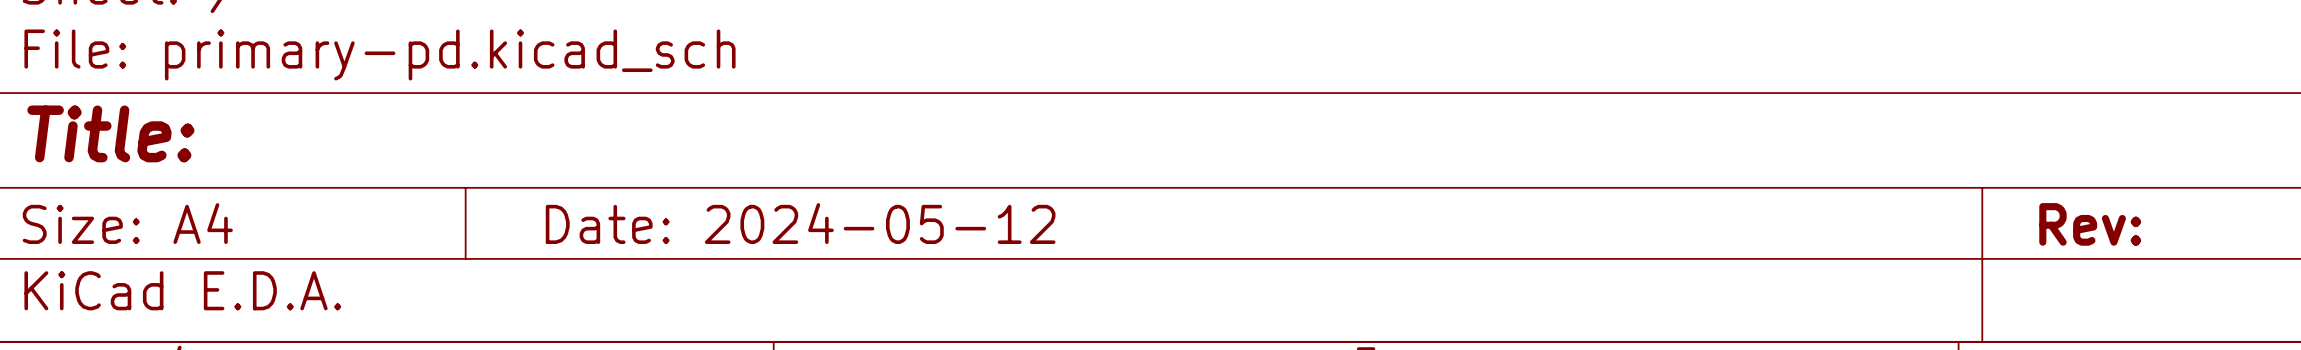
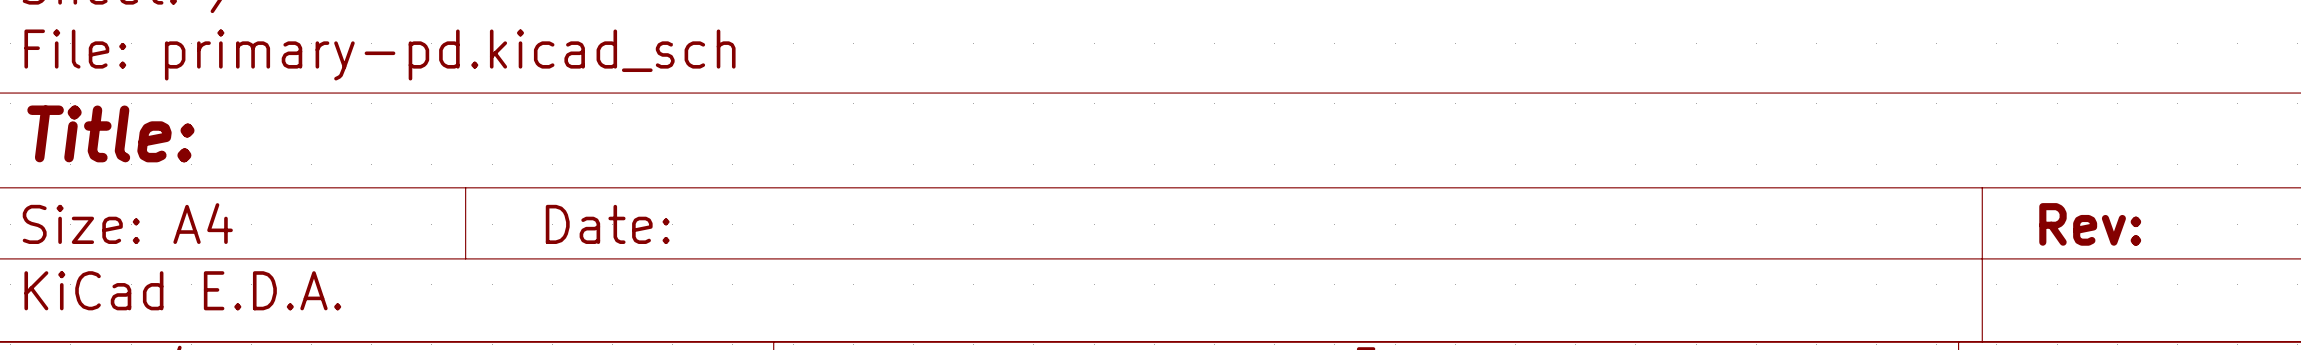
title block: Date: 2024-05-12 (800, 223) -> Date: (607, 224)

